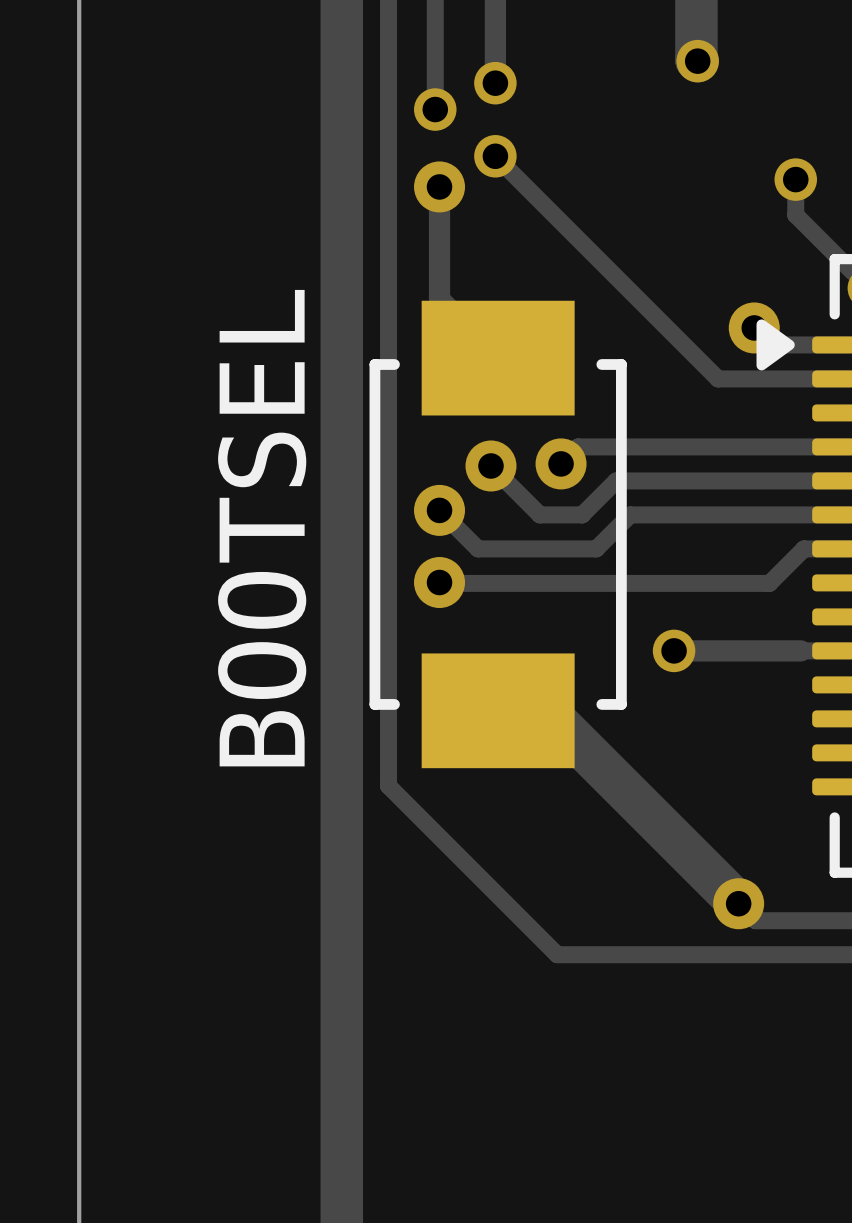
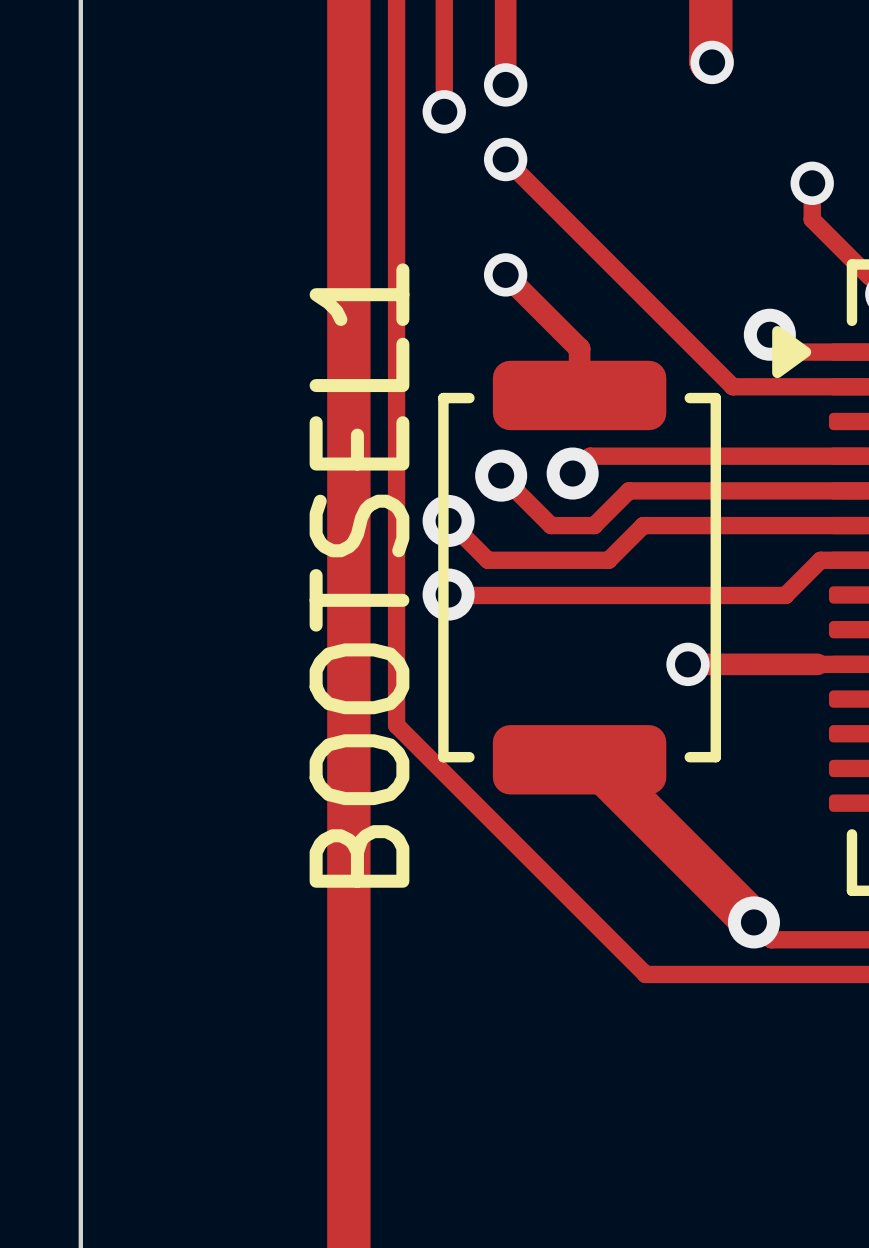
track: (439, 186) (439, 299) (498, 358) -> none
via: (439, 186) -> none
track: none -> (505, 274) (579, 348) (579, 395)
via: none -> (505, 274)
BOOTSEL: (498, 534) -> none
BOOTSEL1: none -> (579, 577)
track: (388, 710) (388, 786) (557, 954) (632, 954) -> (396, 725) (645, 974)

